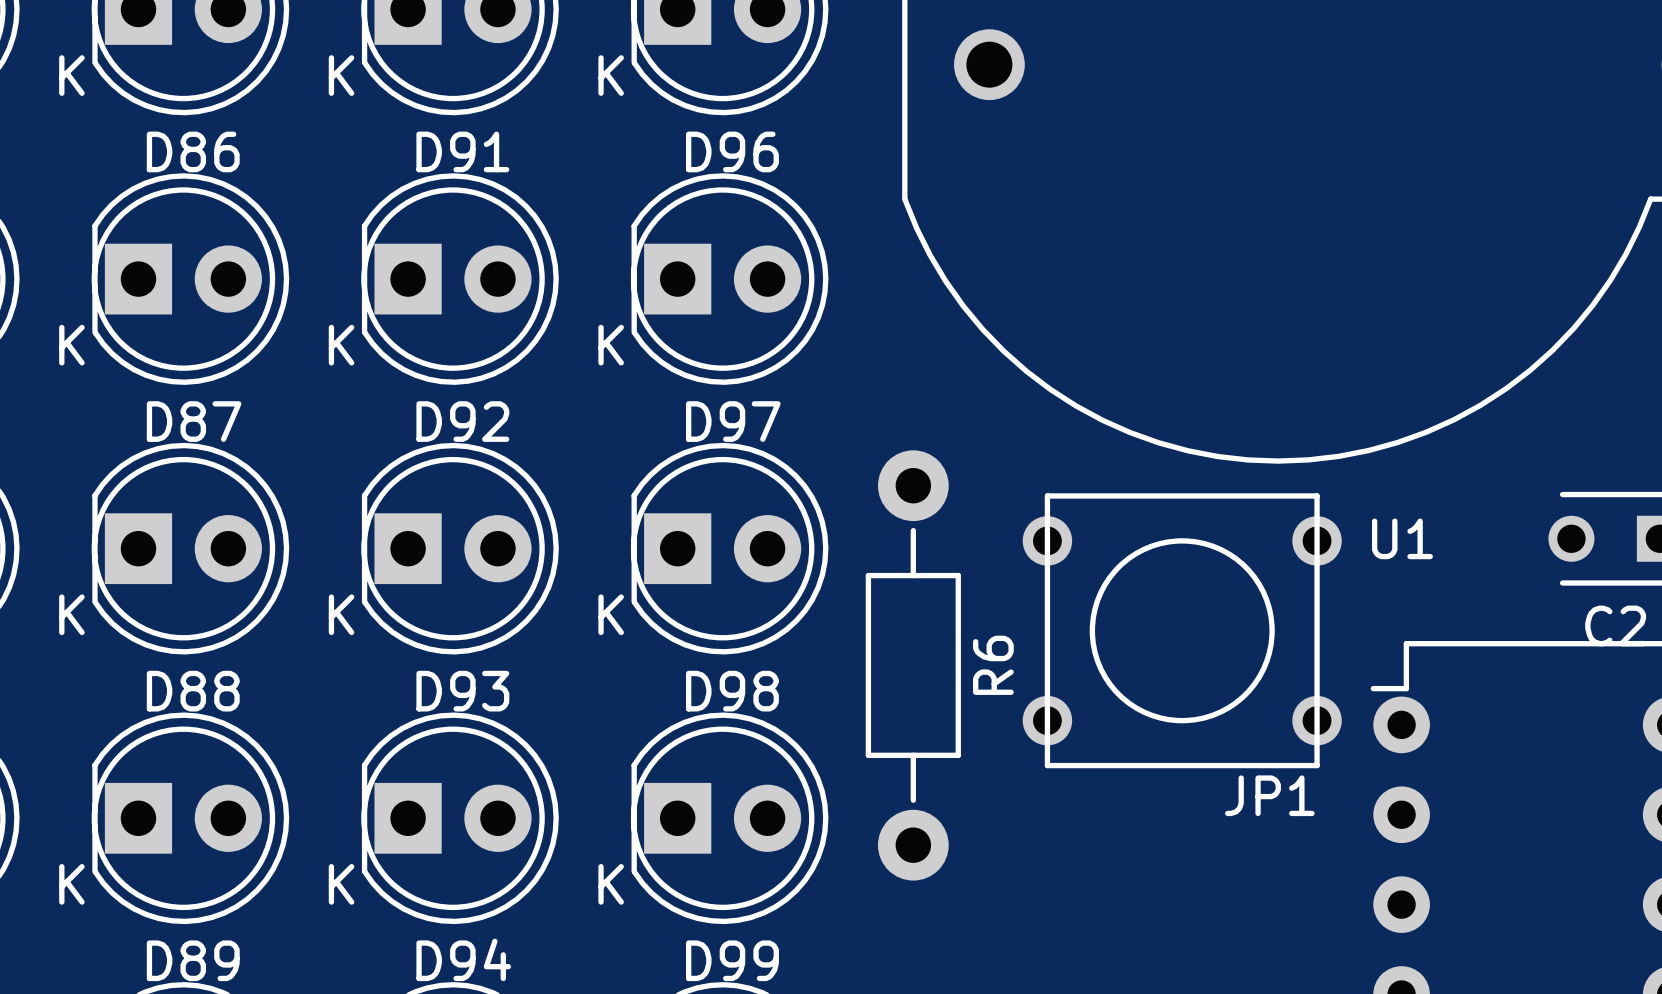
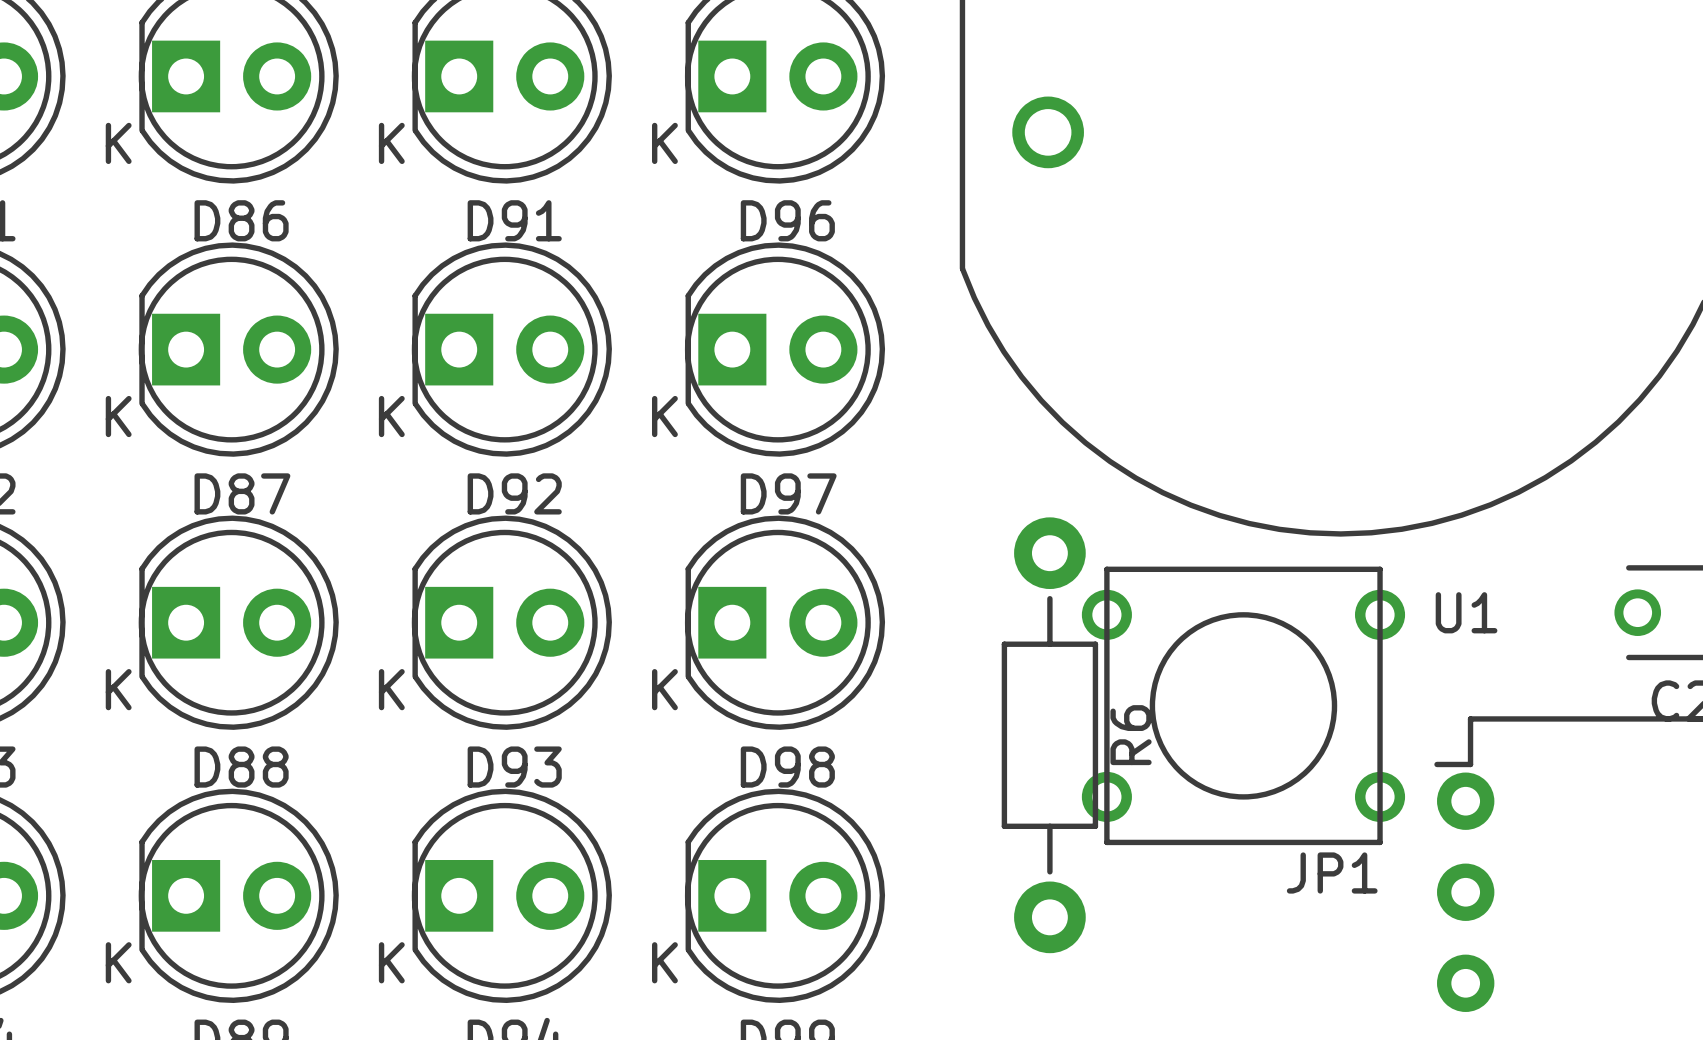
R6 position: (913, 665) -> (1049, 735)

